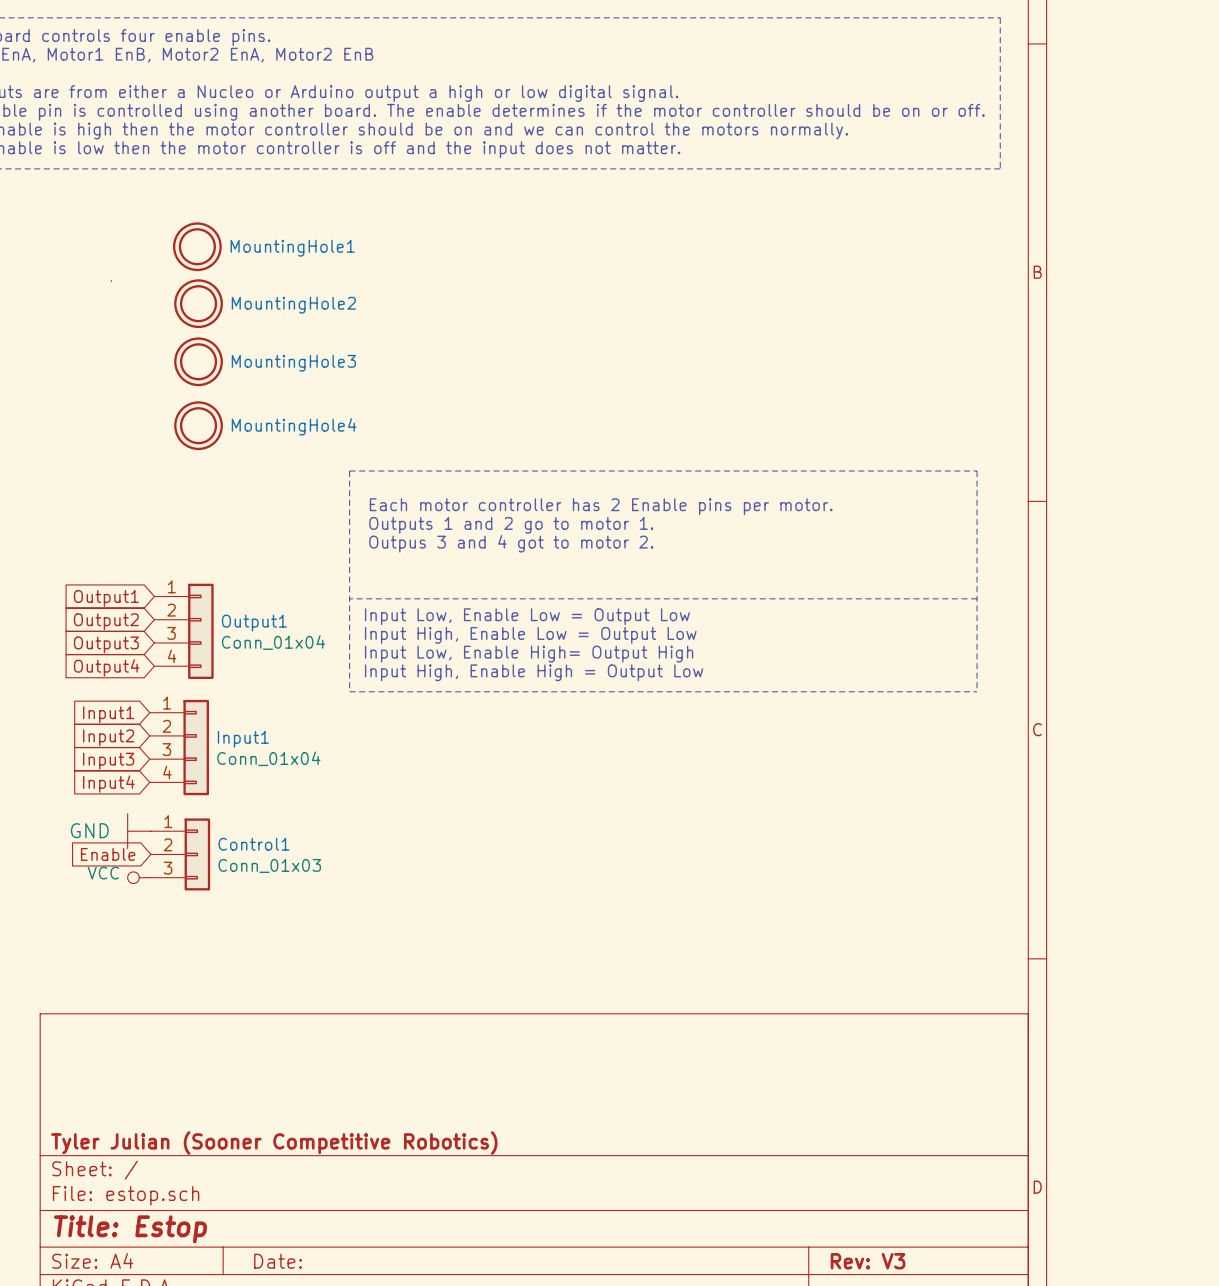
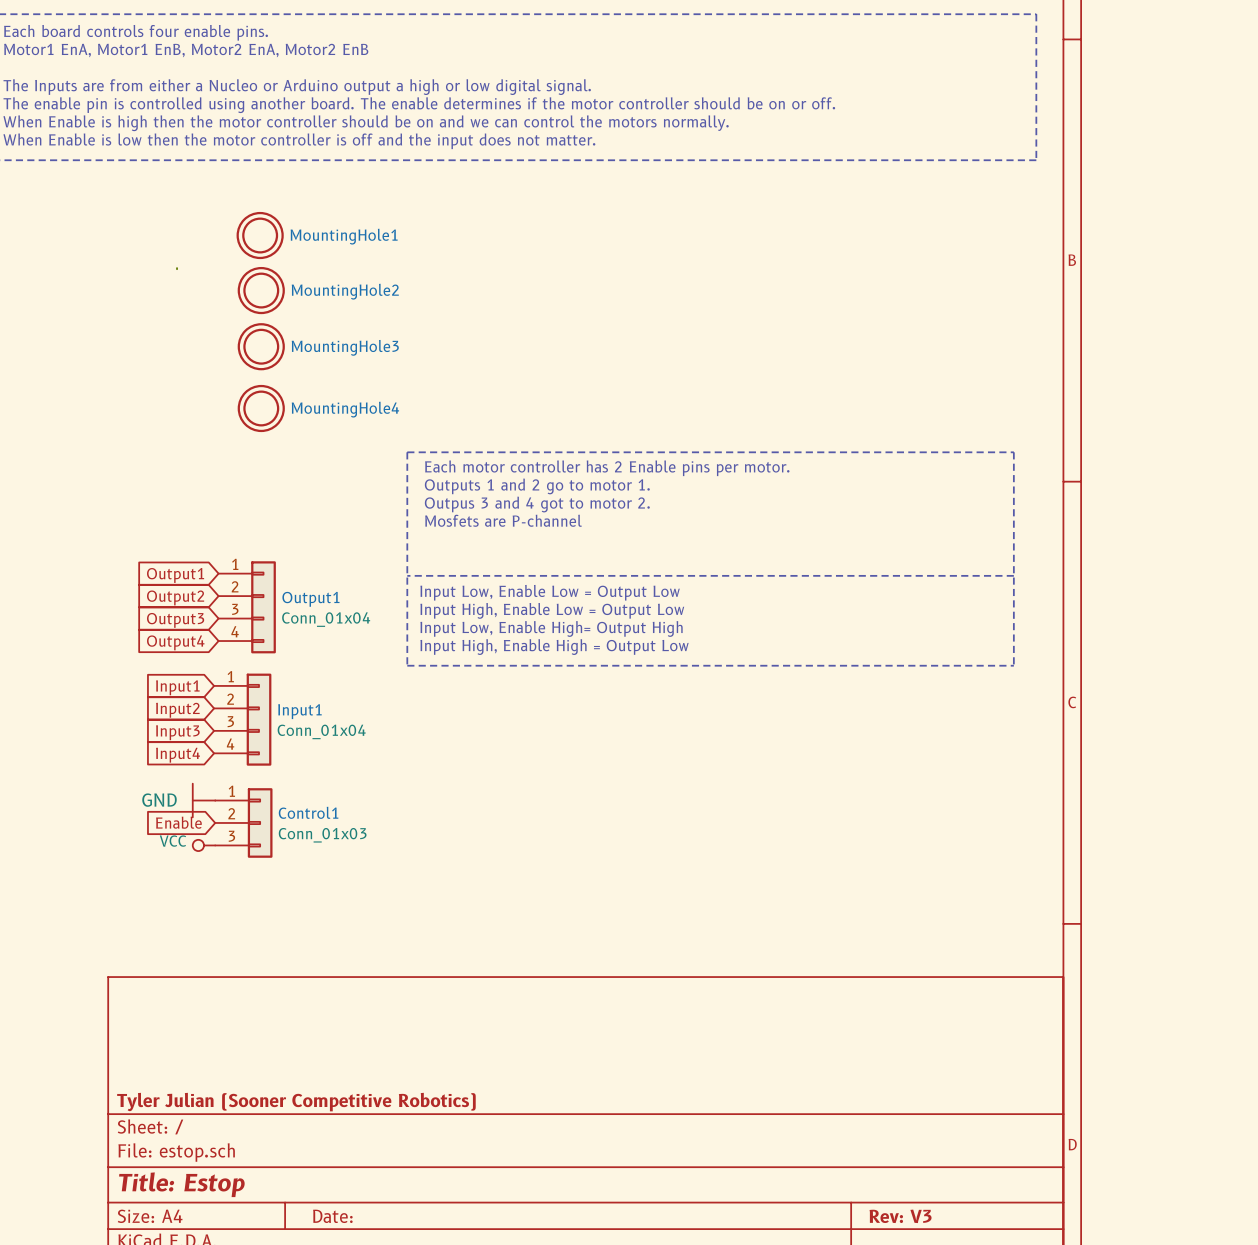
text: none -> Each motor controller has 2 Enable pins per motor. (607, 468)
text: Each motor controller has 2 Enable pins per motor. (601, 506) -> Outputs 1 and 2 go to motor 1. (537, 486)
text: Outputs 1 and 2 go to motor 1. (511, 525) -> Outpus 3 and 4 got to motor 2. (537, 504)
text: Outpus 3 and 4 got to motor 2. (511, 543) -> Mosfets are P-channel (503, 520)

